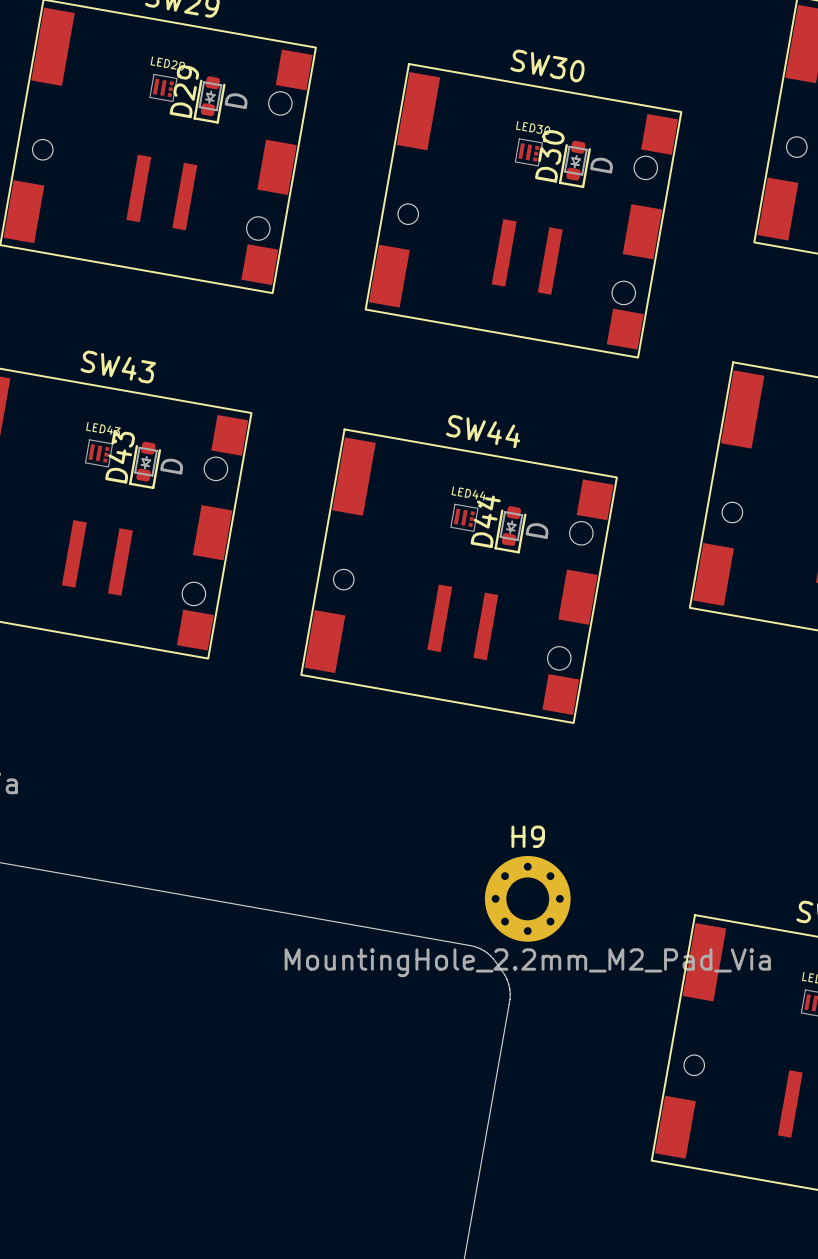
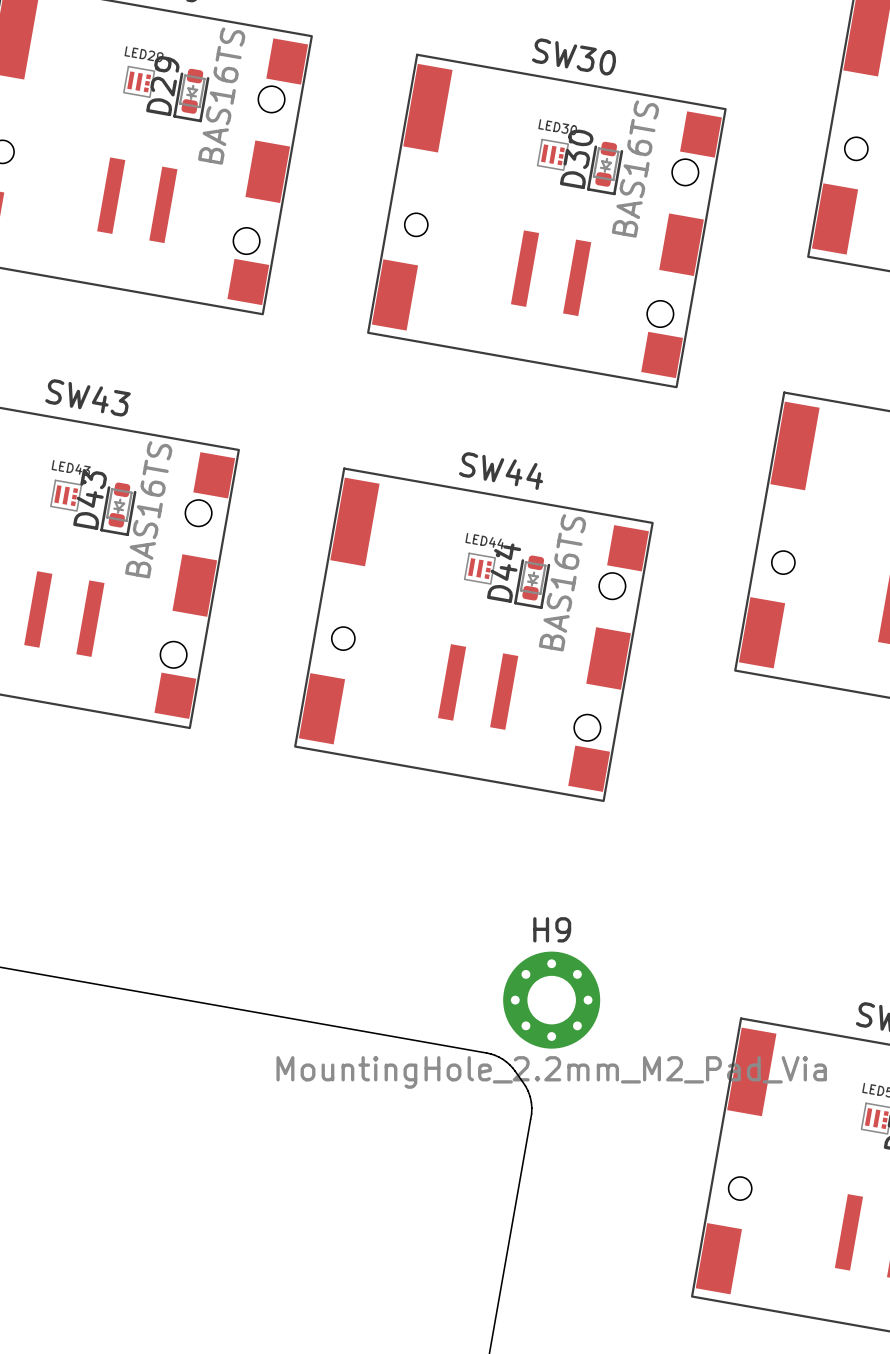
D29 value: D (236, 101) -> BAS16TS (221, 96)
D30 value: D (601, 165) -> BAS16TS (635, 169)
D43 value: D (171, 466) -> BAS16TS (148, 509)
D44 value: D (537, 530) -> BAS16TS (562, 582)

